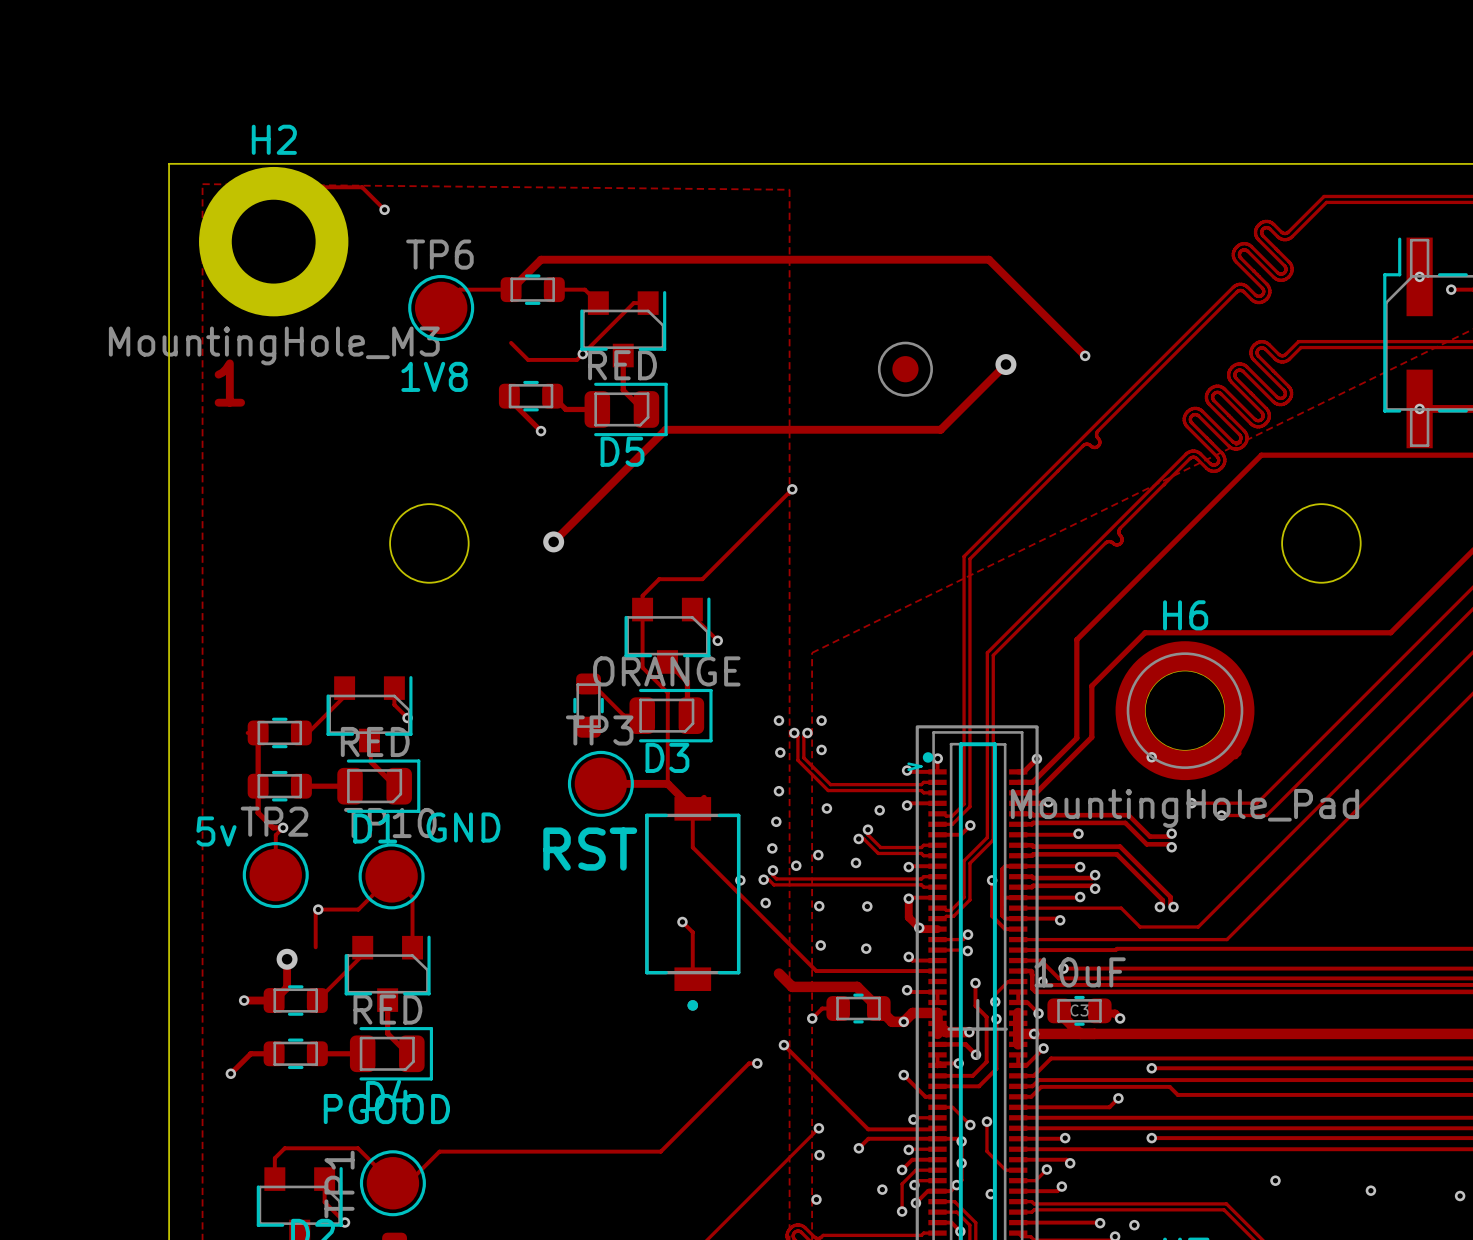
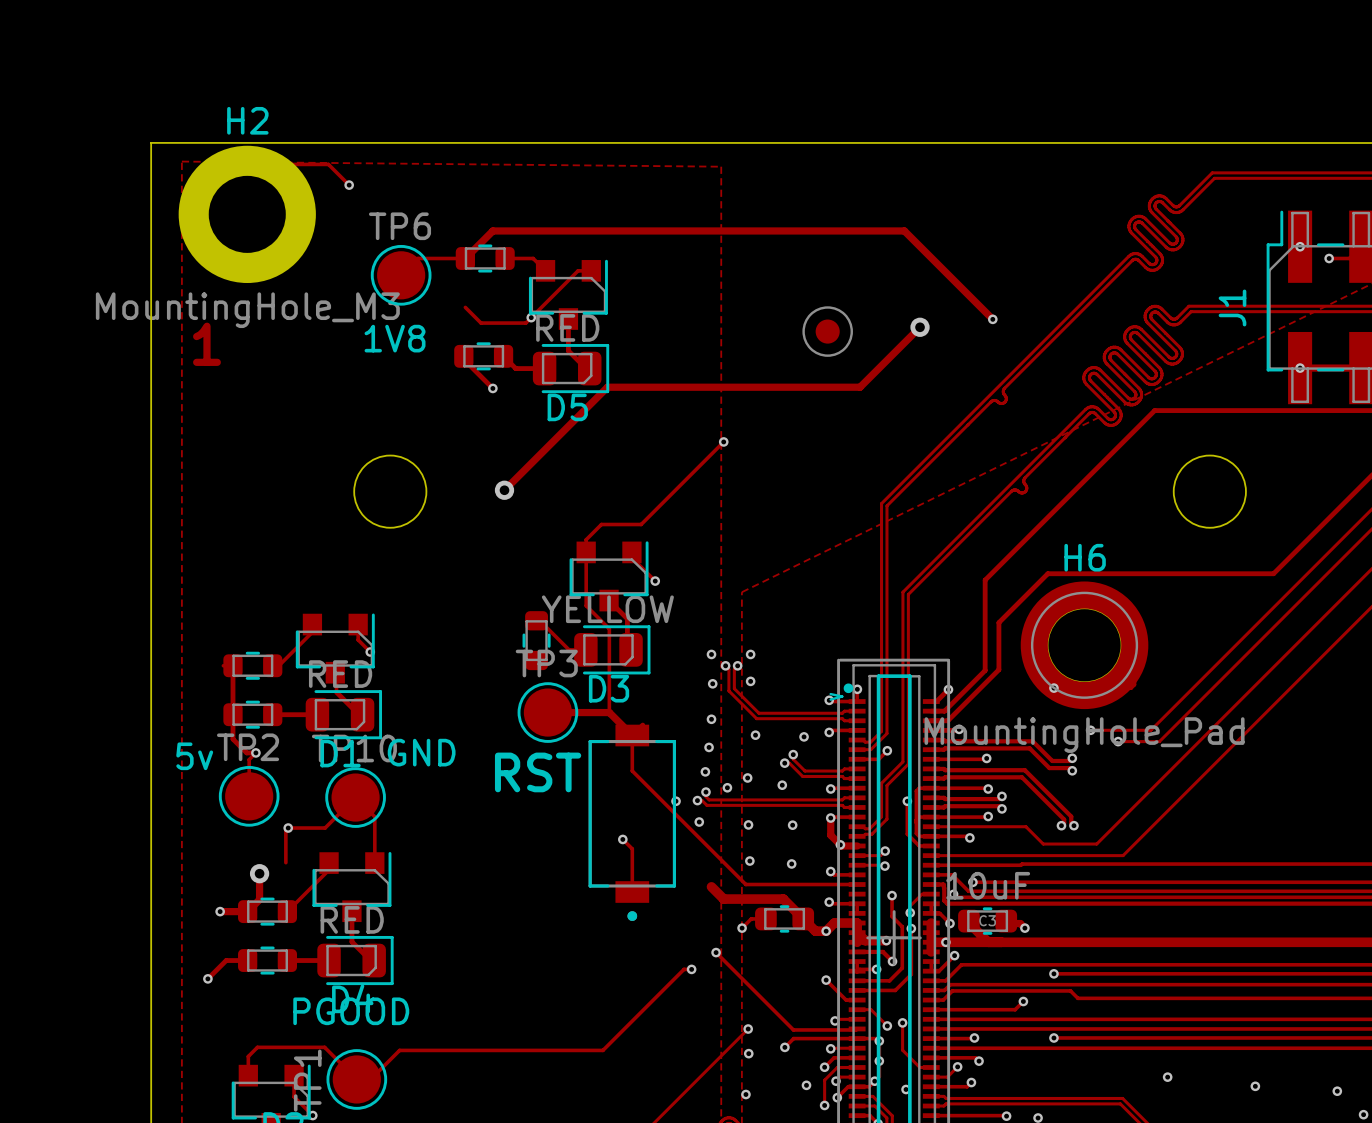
J1 name: none -> J1 (1232, 307)
D3 value: ORANGE (666, 671) -> YELLOW (607, 609)

